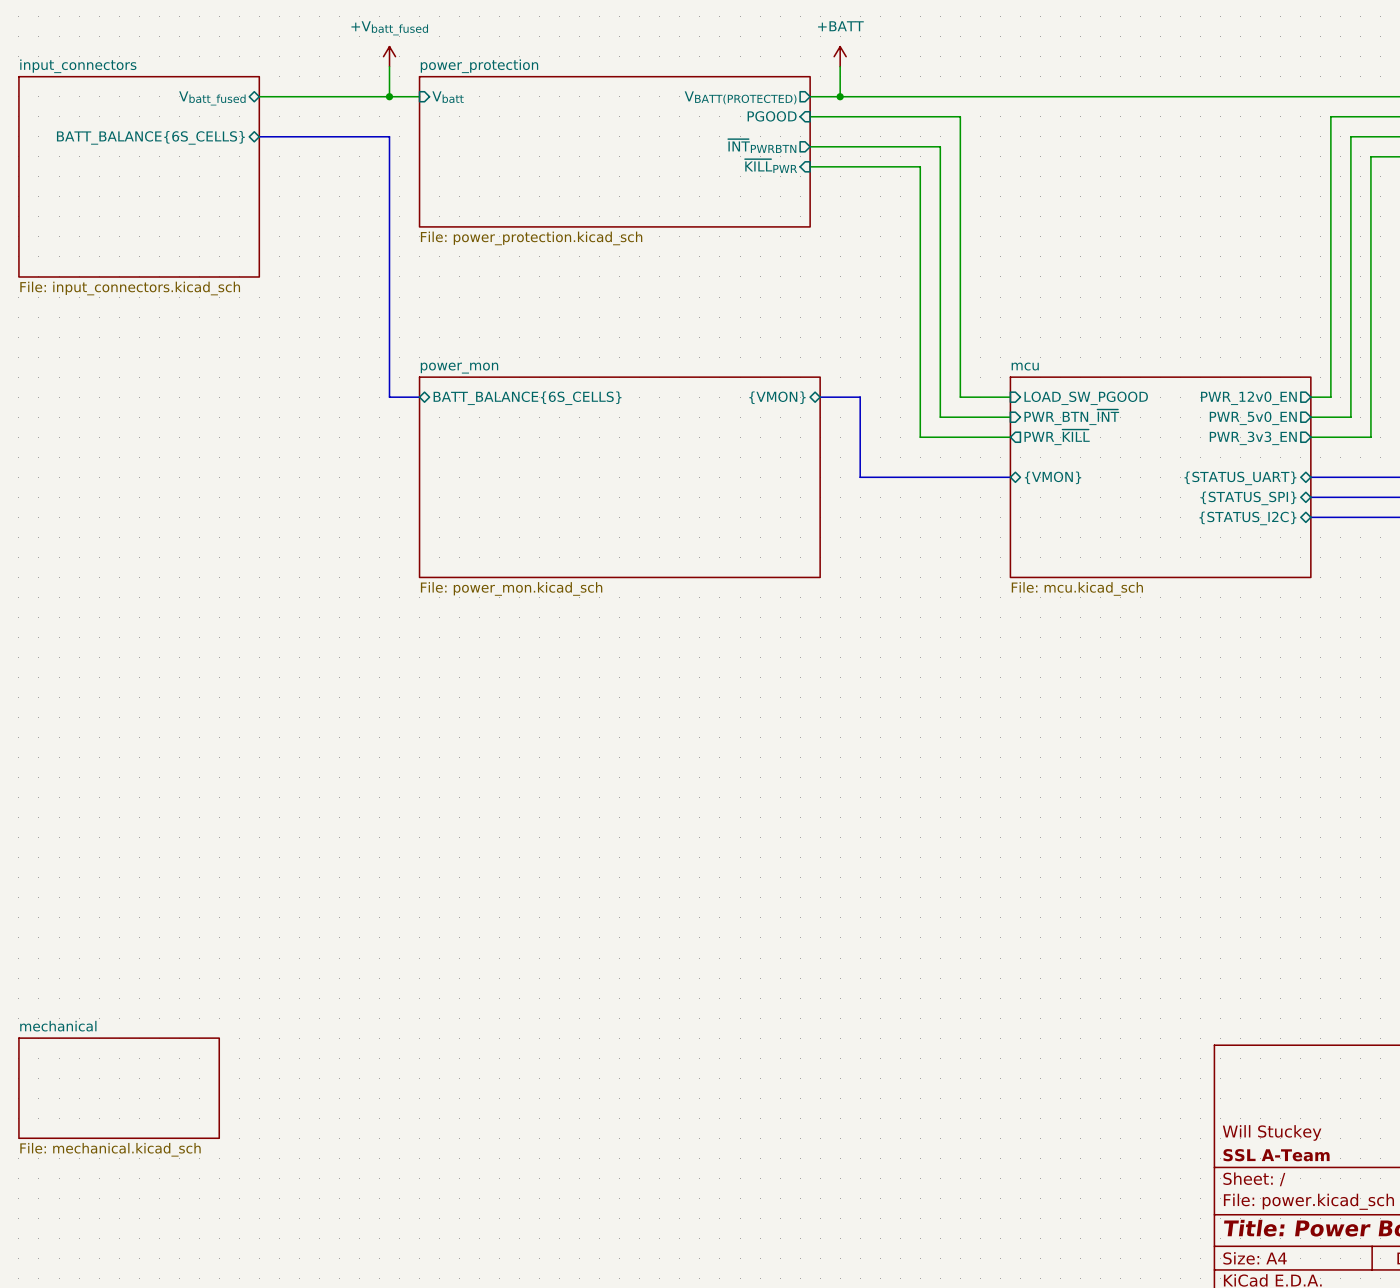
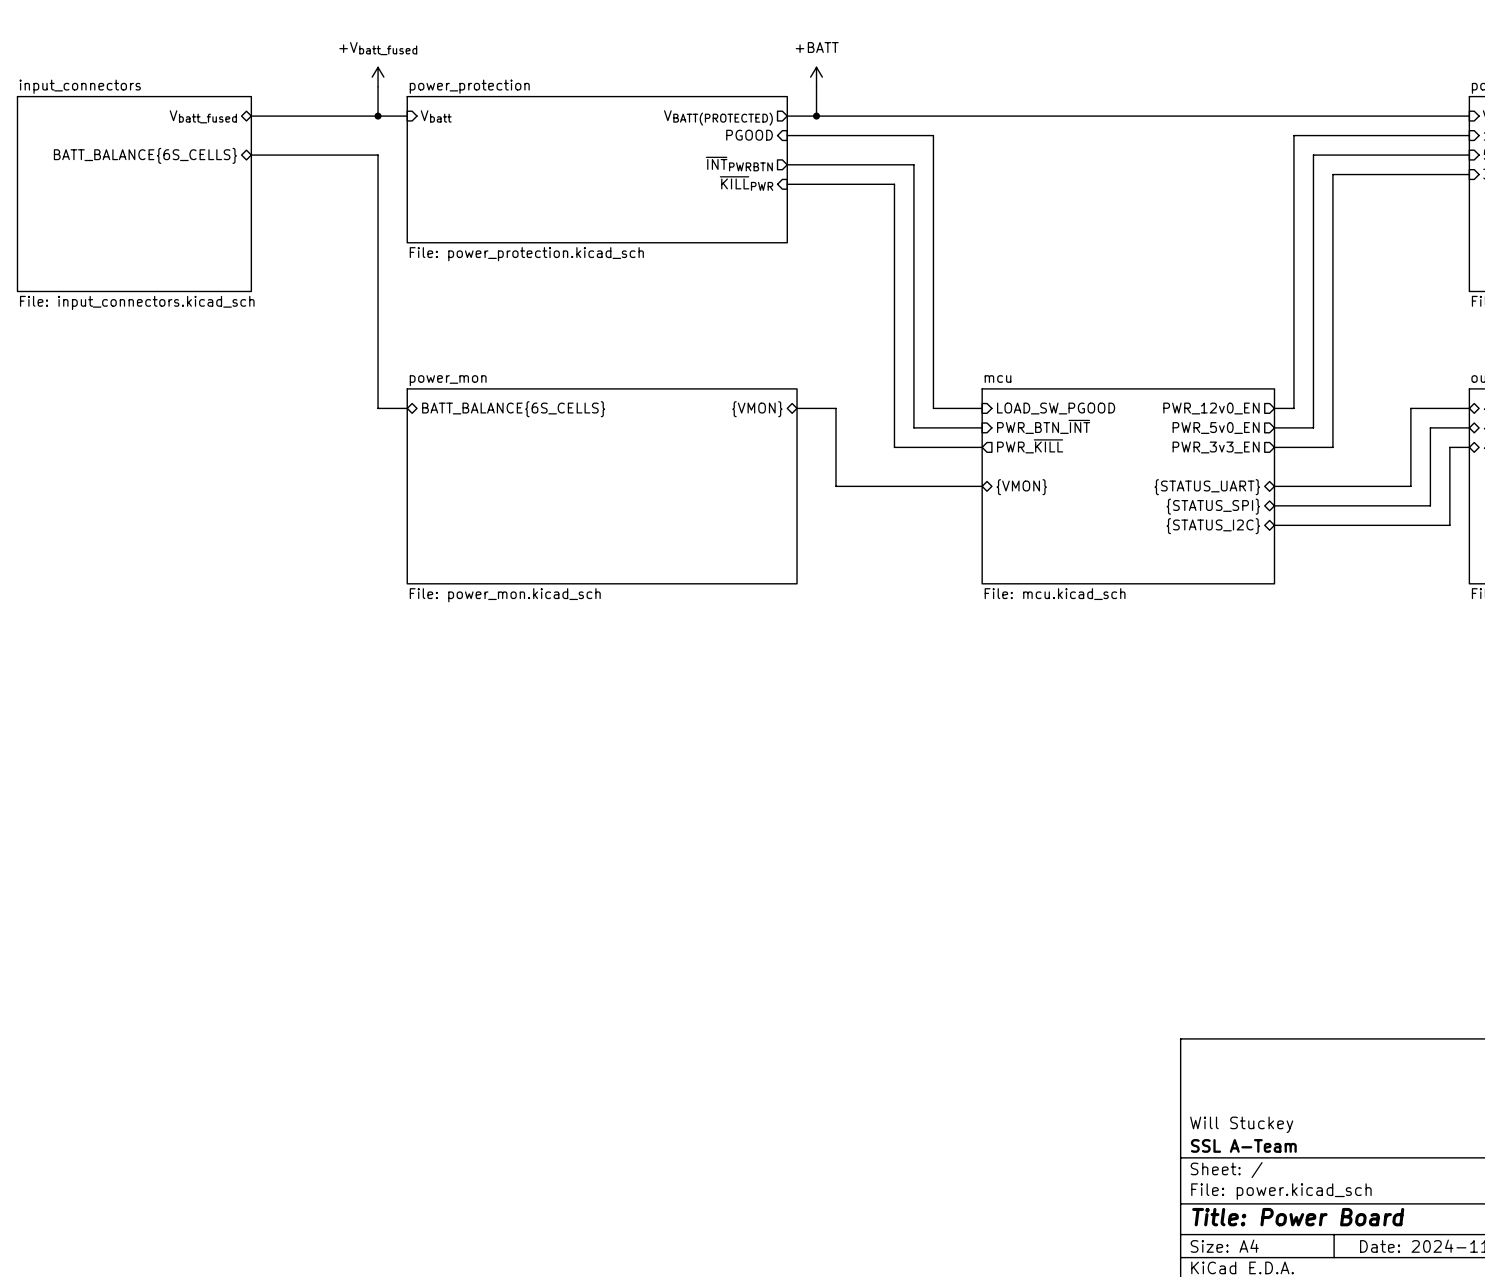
sheet mechanical: File: mechanical.kicad_sch (119, 1088) -> none

